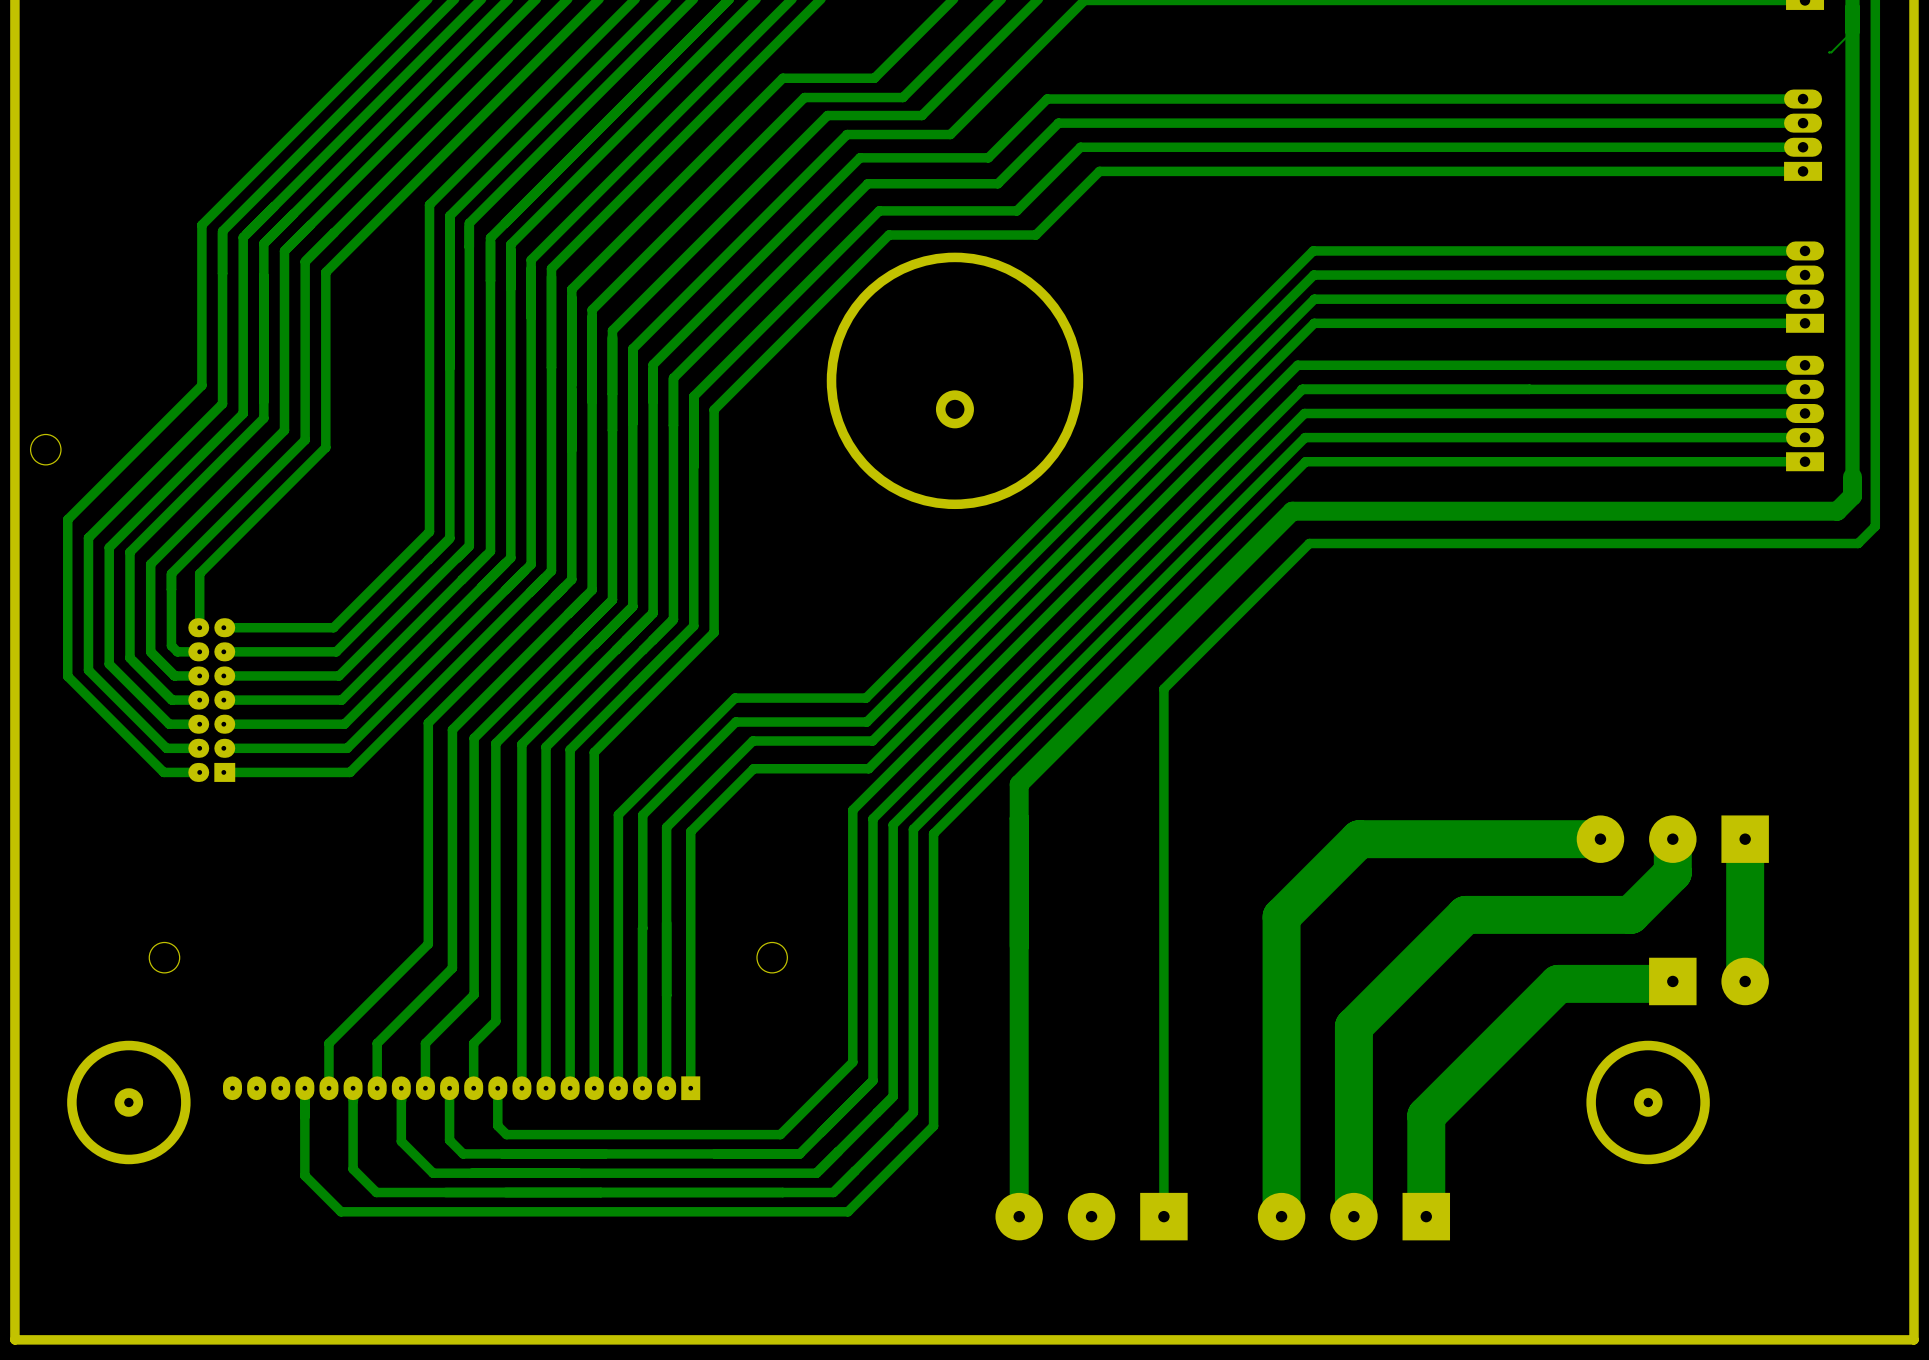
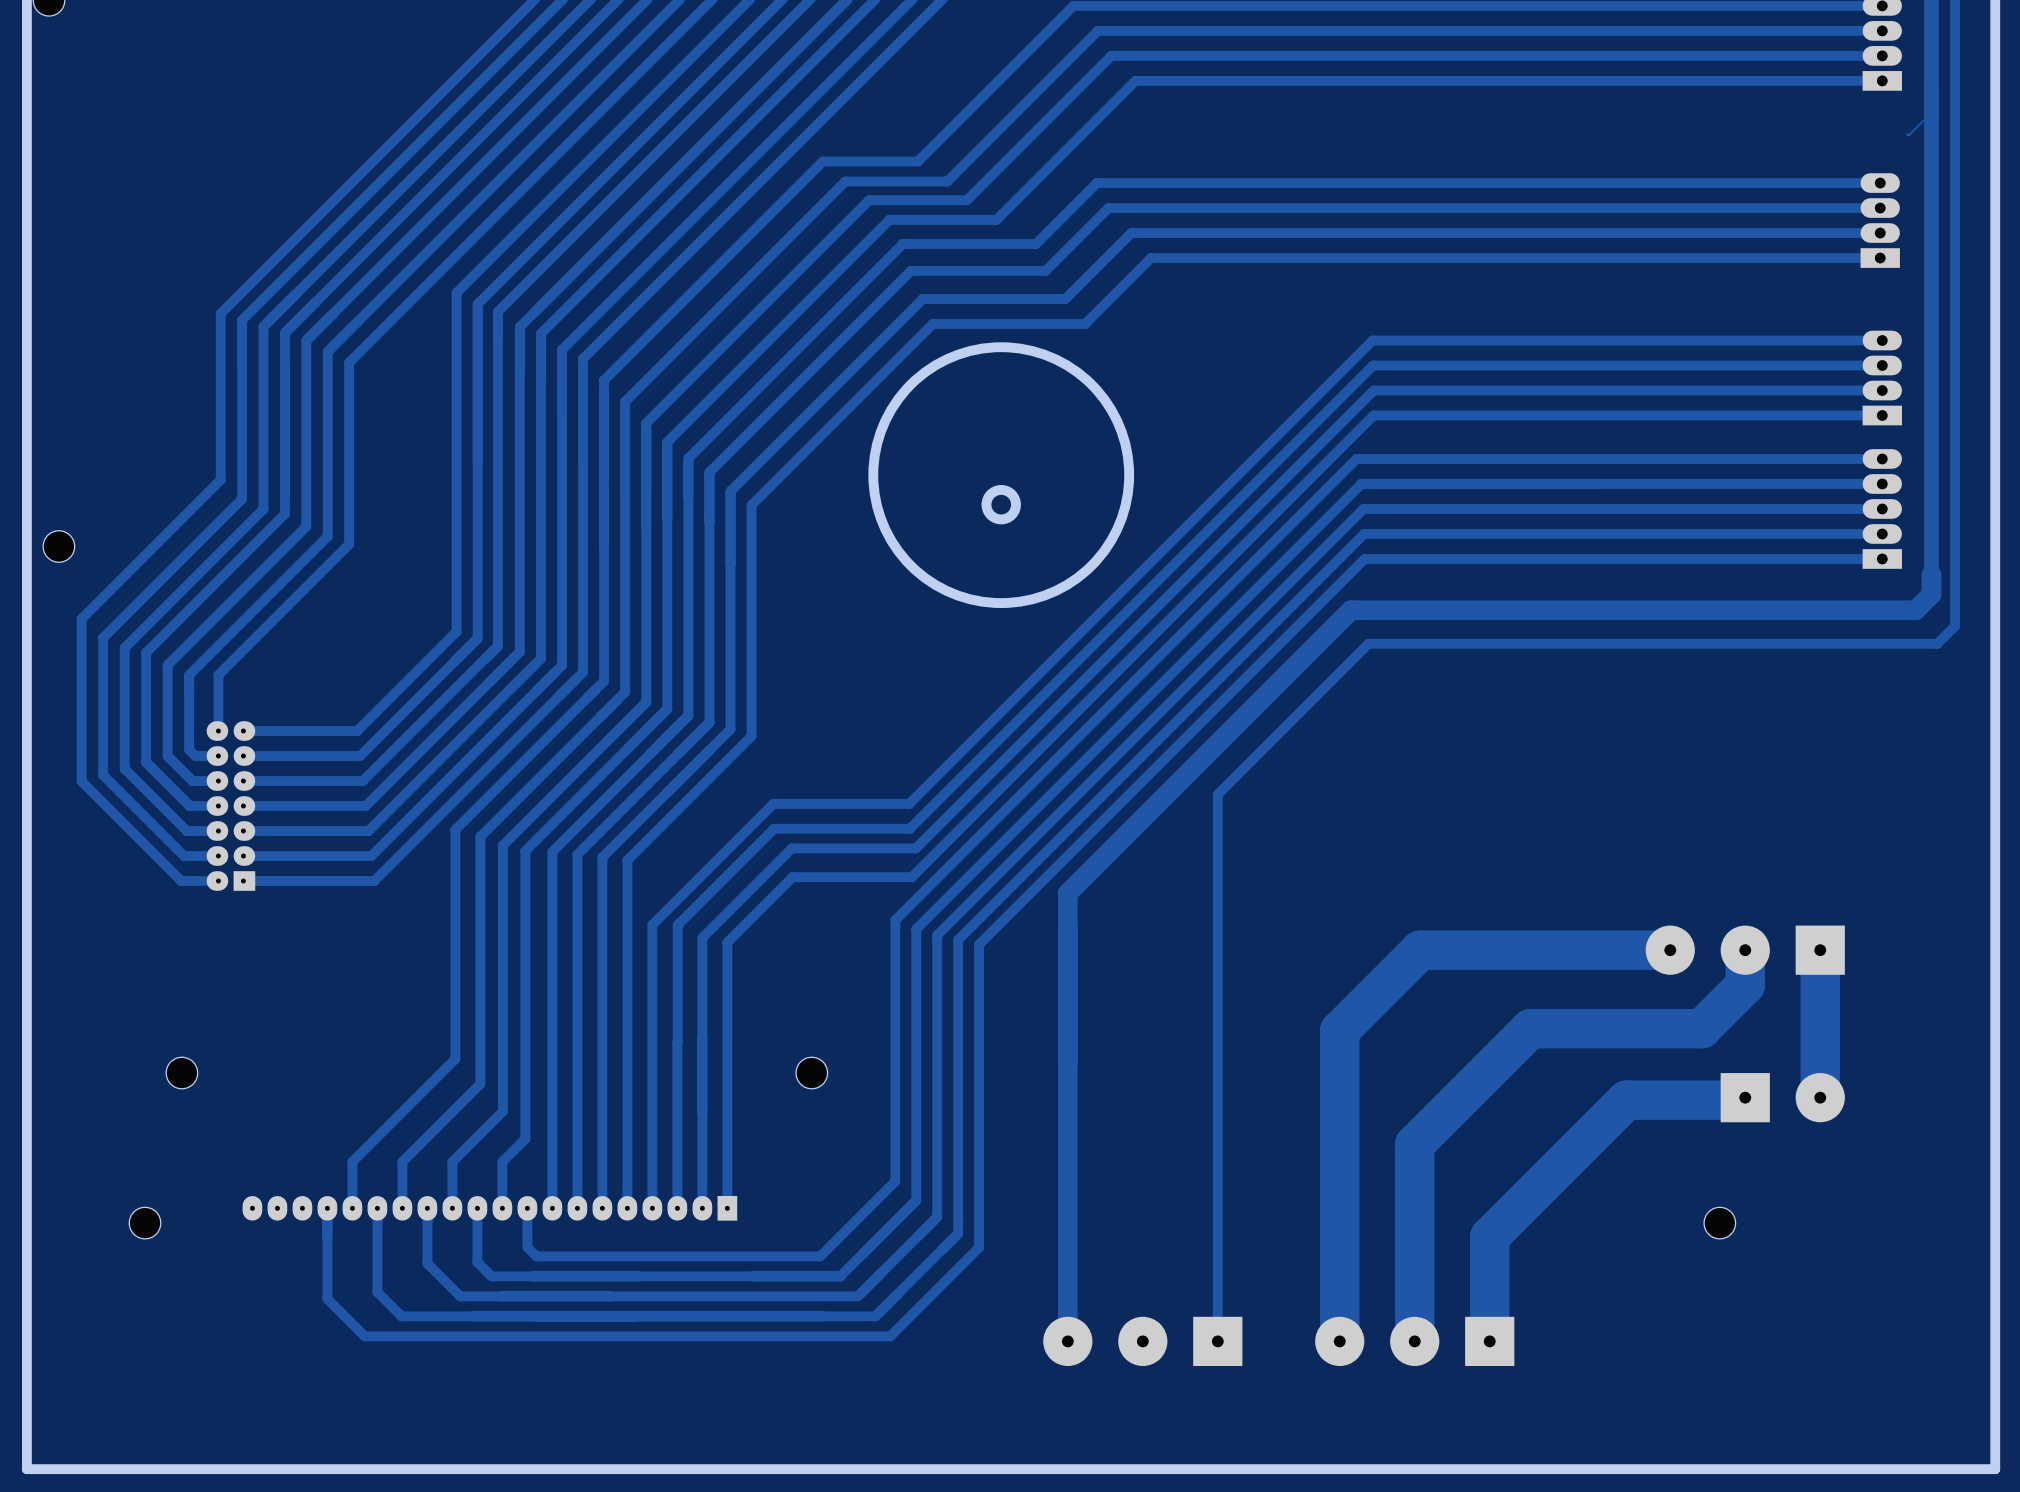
round board edge: [67, 1040, 191, 1165] -> none
round board edge: [1586, 1040, 1710, 1165] -> none
round board edge: [114, 1088, 144, 1117] -> none
round board edge: [1634, 1088, 1663, 1117] -> none
part: none -> (145, 1223)
part: none -> (1719, 1223)

